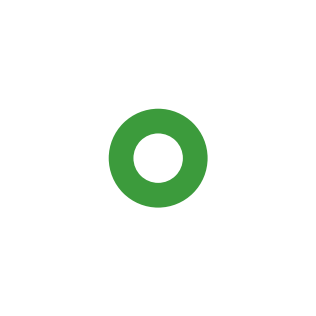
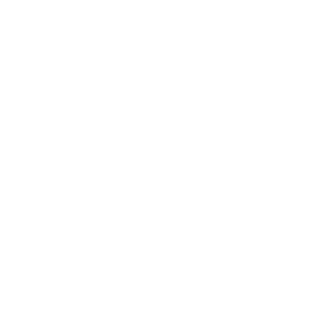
via: (158, 158) -> none

